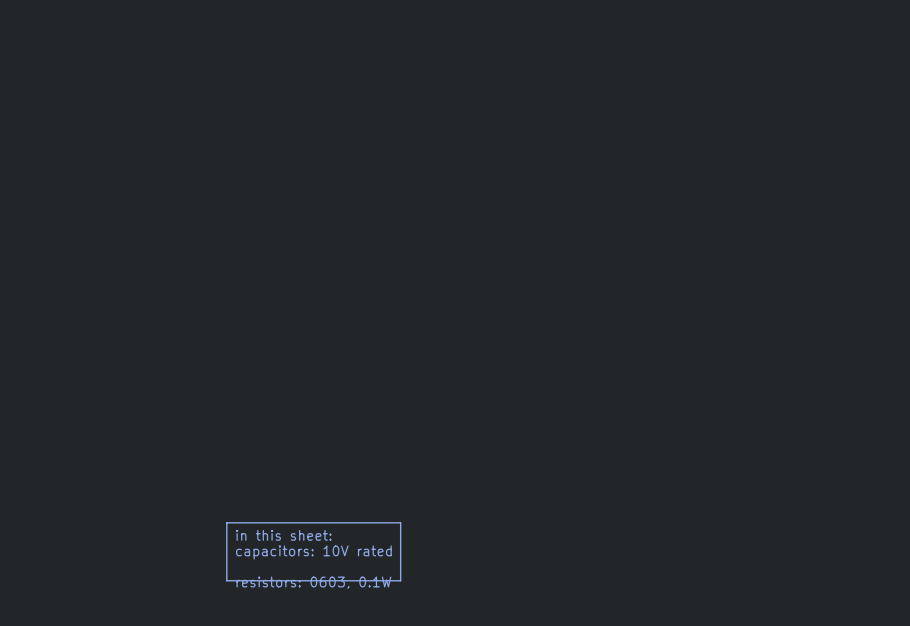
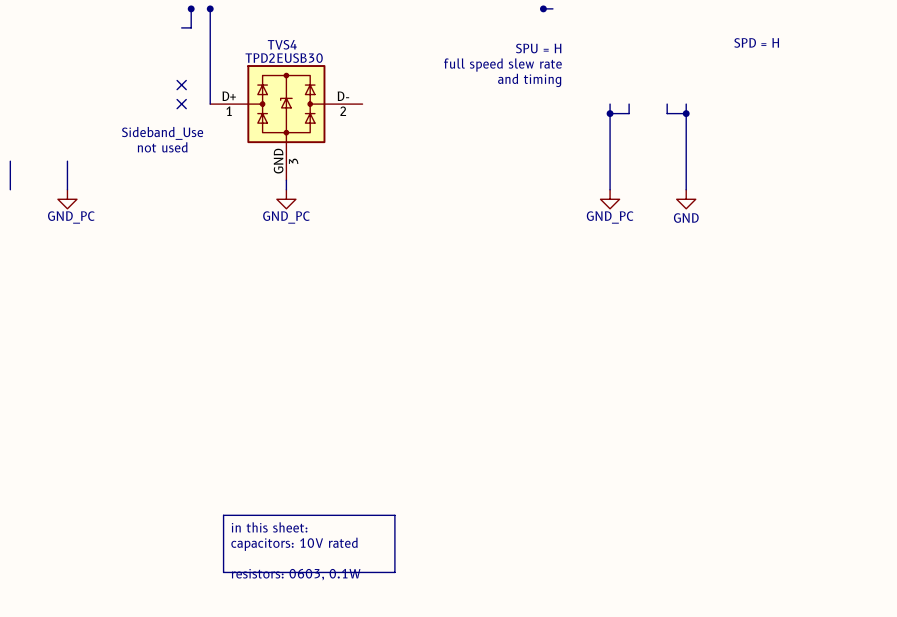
wire: none -> (191, 8) (191, 27) (181, 27)
junction: none -> (191, 8)
wire: none -> (210, 8) (210, 104)
junction: none -> (210, 8)
wire: none -> (543, 8) (552, 8)
junction: none -> (543, 8)
text: none -> SPD = H (756, 42)
text: none -> SPU = H (538, 48)
text: none -> full speed slew rate (502, 65)
text: none -> and timing (529, 80)
no-connect mark: none -> (181, 85)
no-connect mark: none -> (181, 104)
wire: none -> (610, 104) (610, 189)
wire: none -> (629, 104) (629, 113) (610, 113)
wire: none -> (667, 104) (667, 113) (686, 113)
wire: none -> (686, 104) (686, 189)
junction: none -> (610, 113)
junction: none -> (686, 113)
TVS4: none -> TPD2EUSB30 (286, 122)
text: none -> Sideband_Use (162, 133)
text: none -> not used (162, 147)
wire: none -> (10, 161) (10, 189)
wire: none -> (67, 161) (67, 189)
wire: none -> (286, 180) (286, 189)
power symbol: none -> GND_PC (67, 199)
power symbol: none -> GND_PC (286, 199)
power symbol: none -> GND_PC (610, 199)
power symbol: none -> GND (686, 199)

